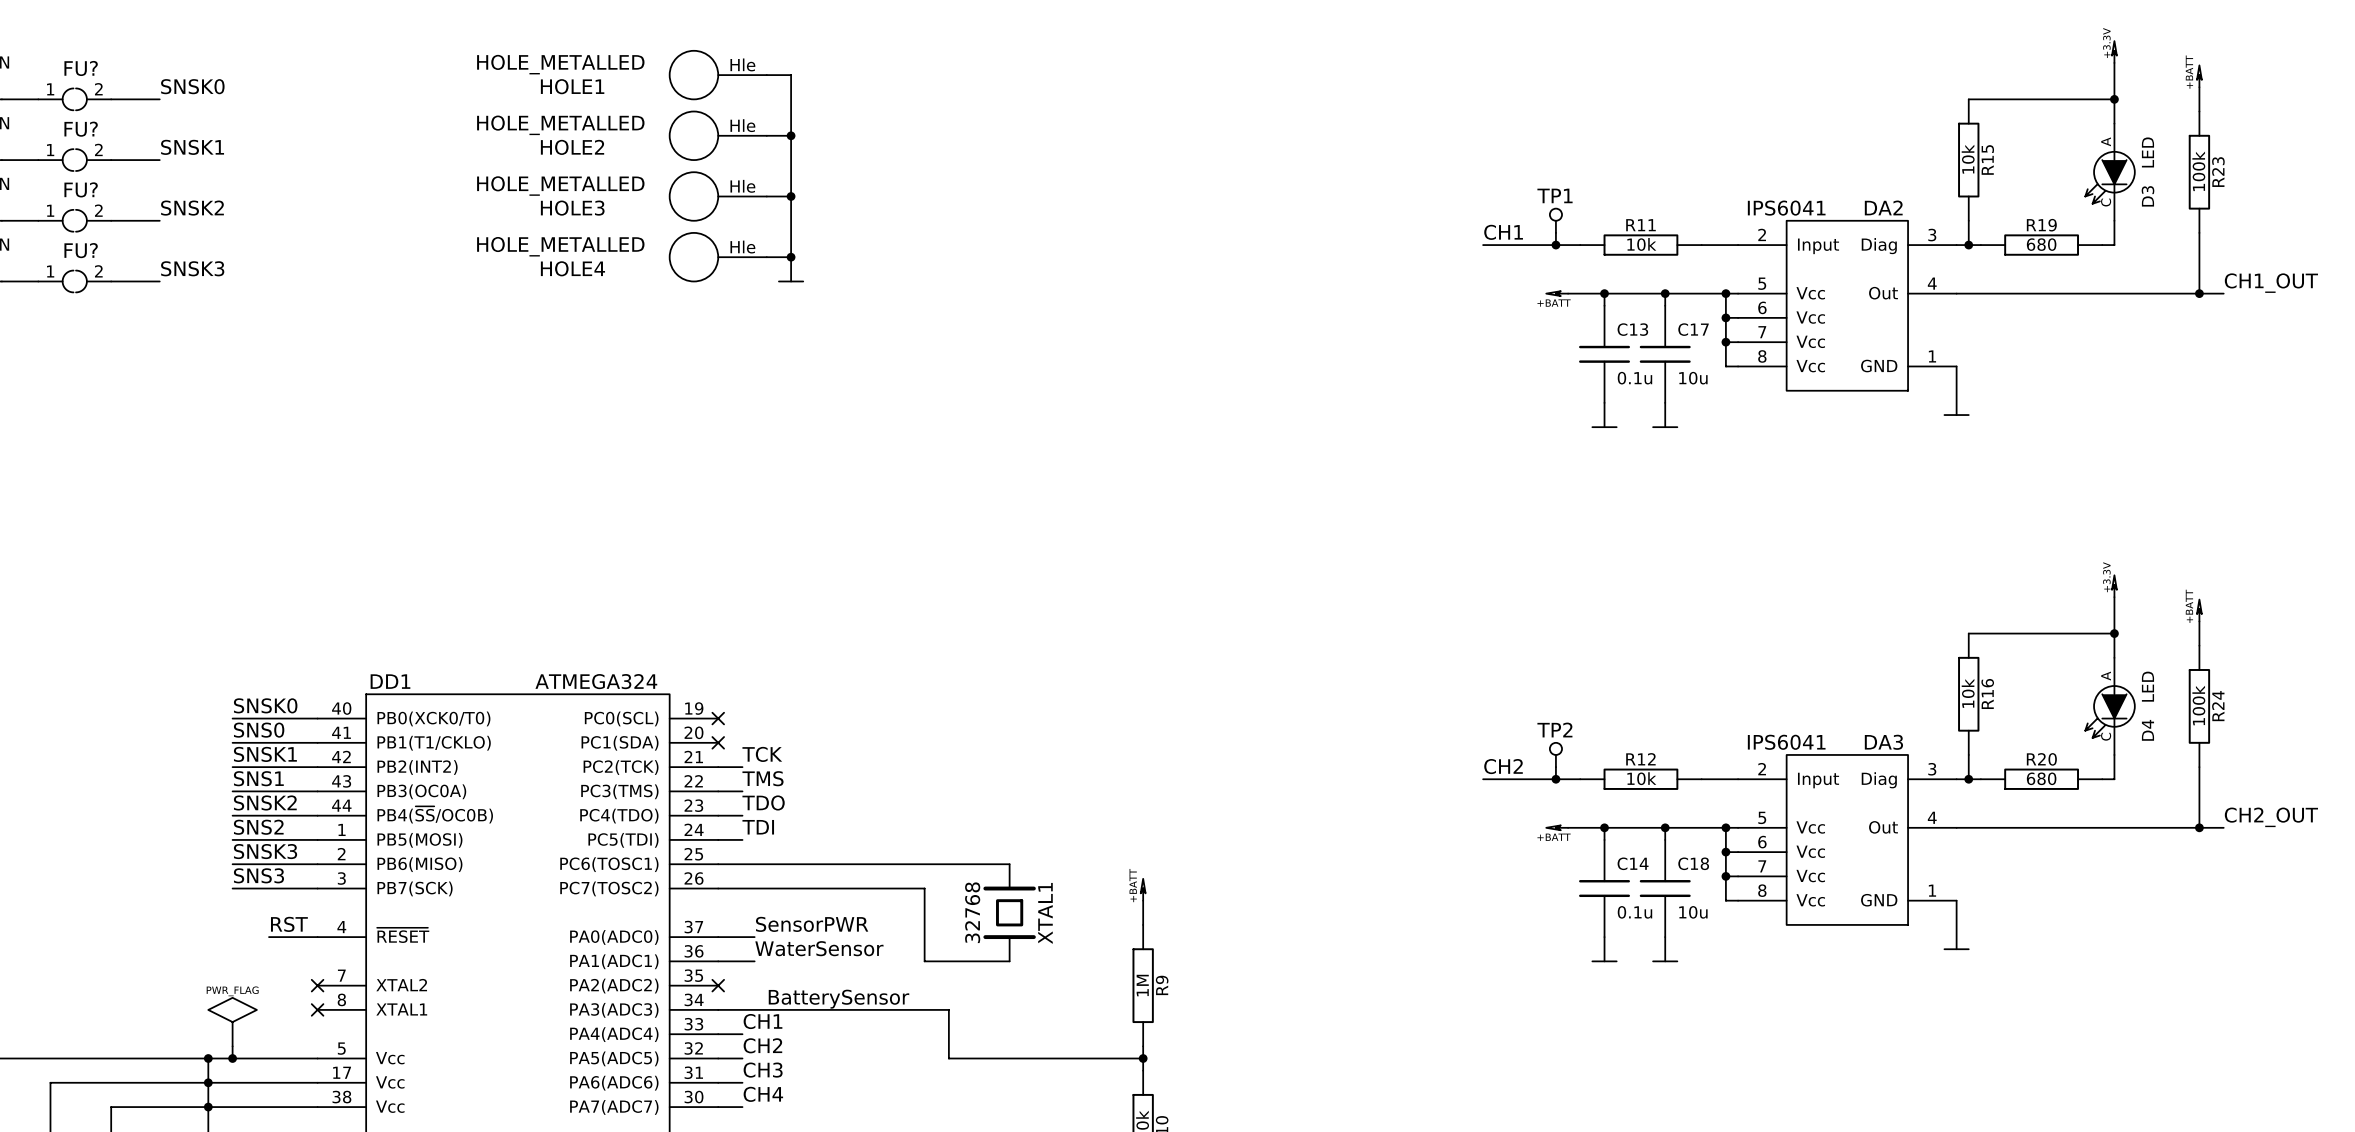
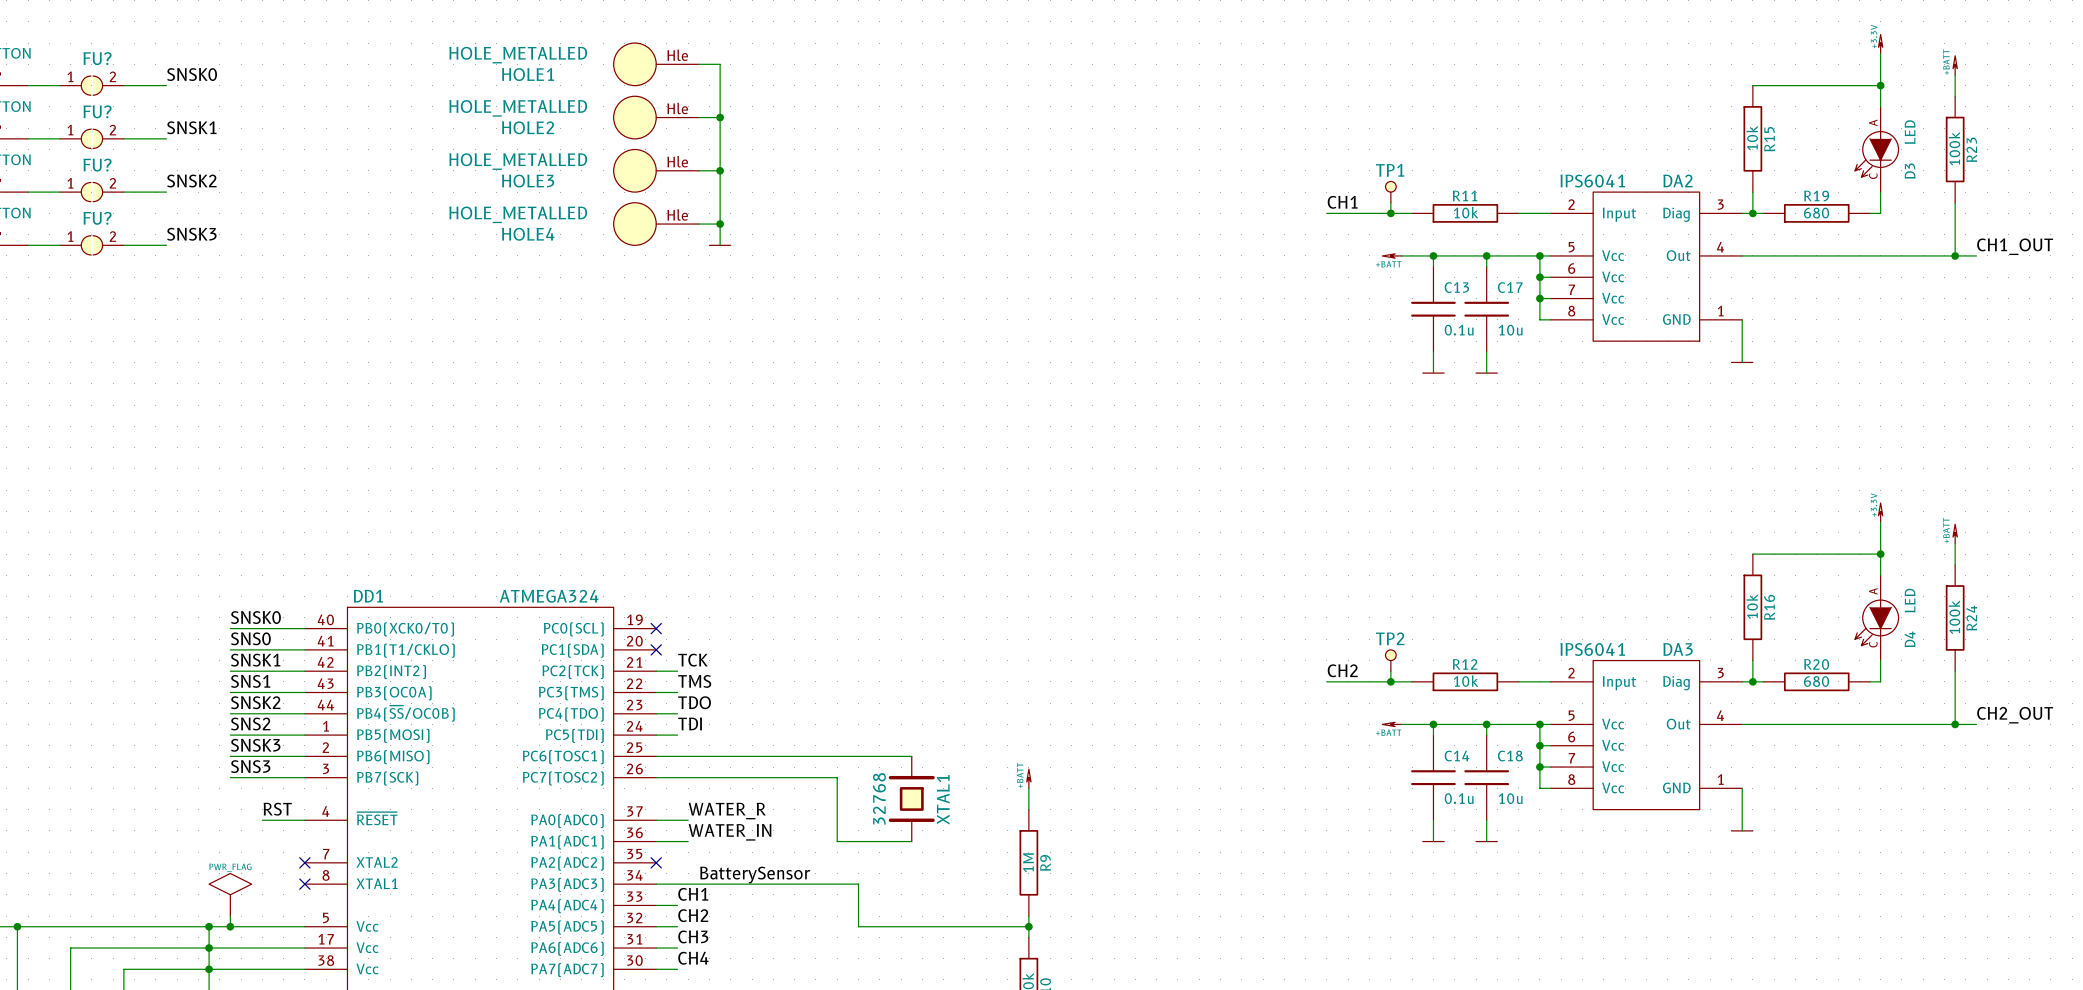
label: SensorPWR (812, 924) -> WATER_R (727, 811)
label: WaterSensor (819, 948) -> WATER_IN (730, 832)

